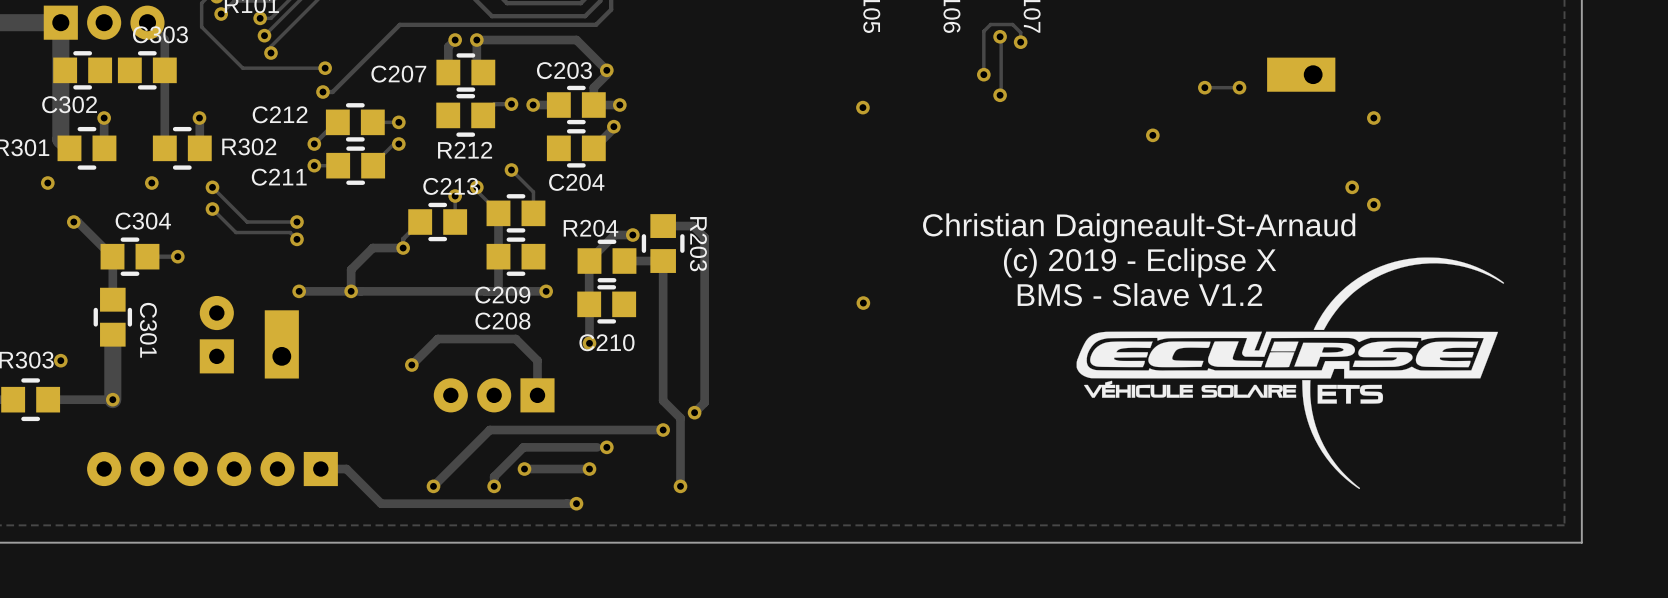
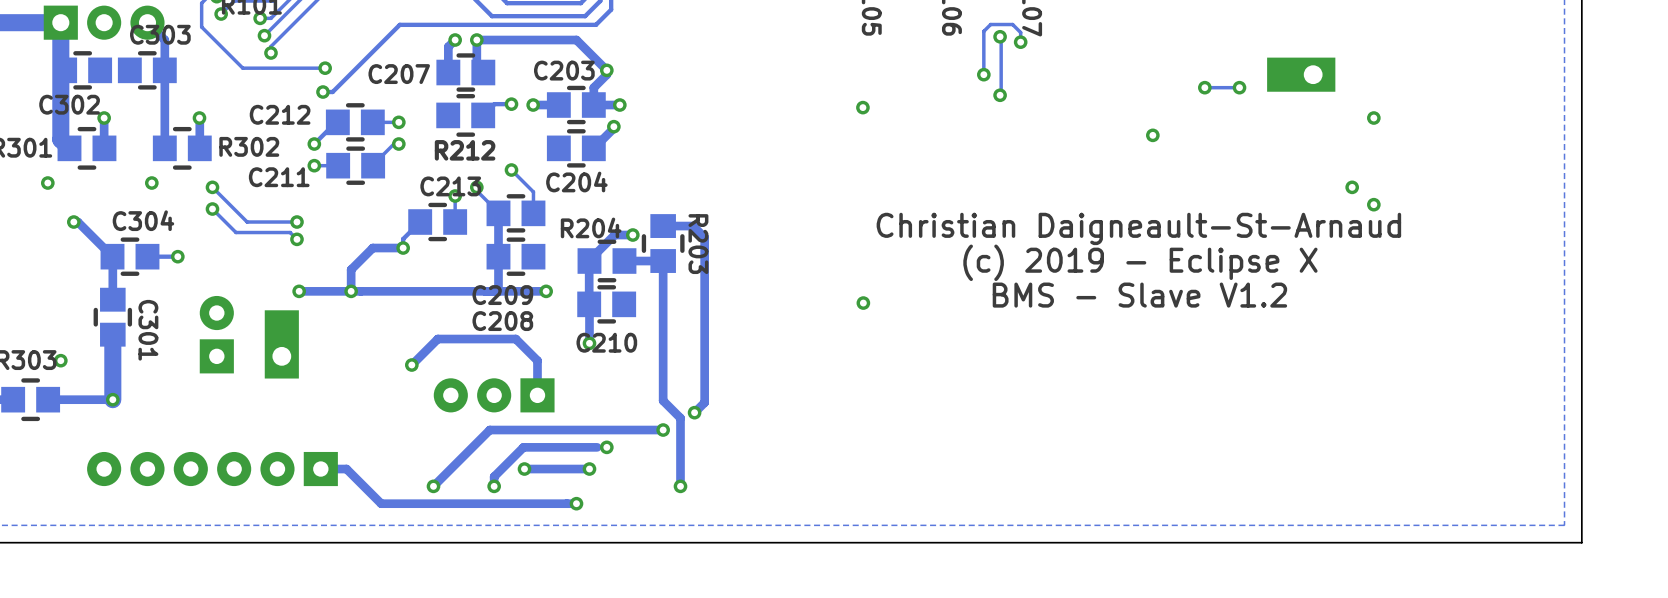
drawing: [1076, 257, 1505, 490] -> none

